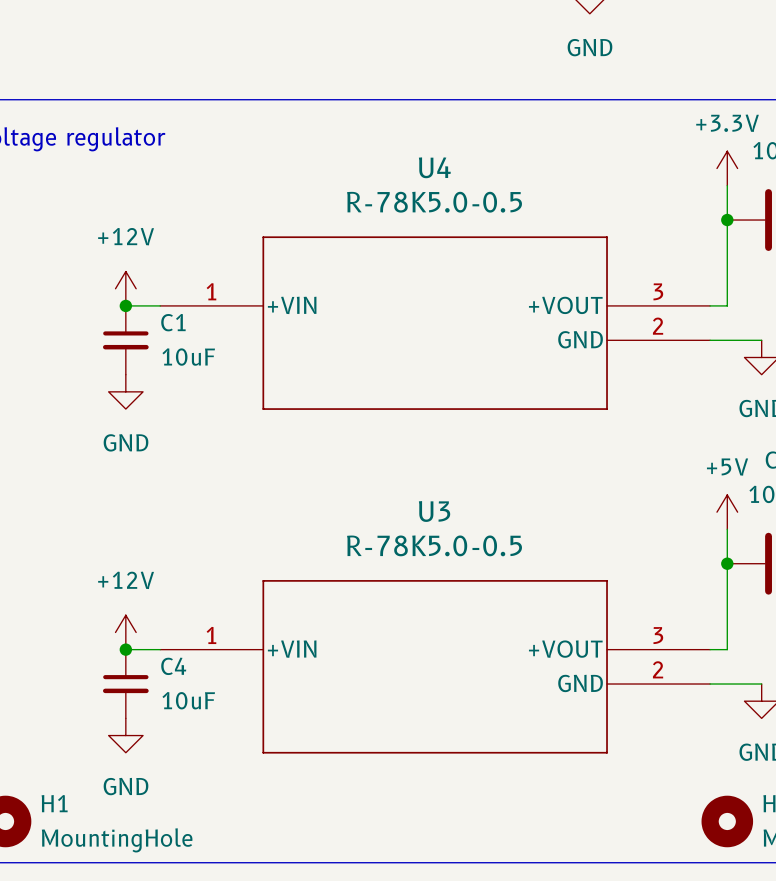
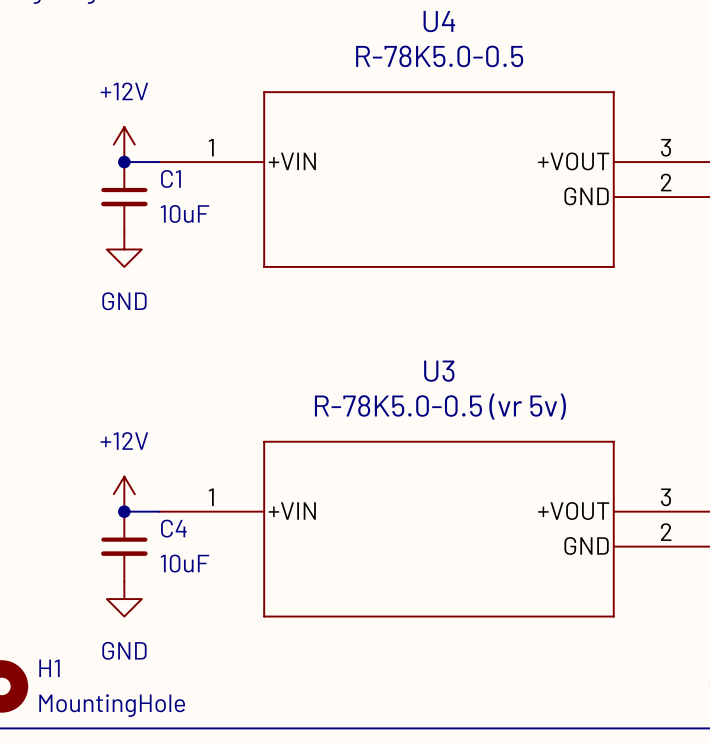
U3 value: R-78K5.0-0.5 (434, 545) -> R-78K5.0-0.5 (vr 5v) (440, 406)

